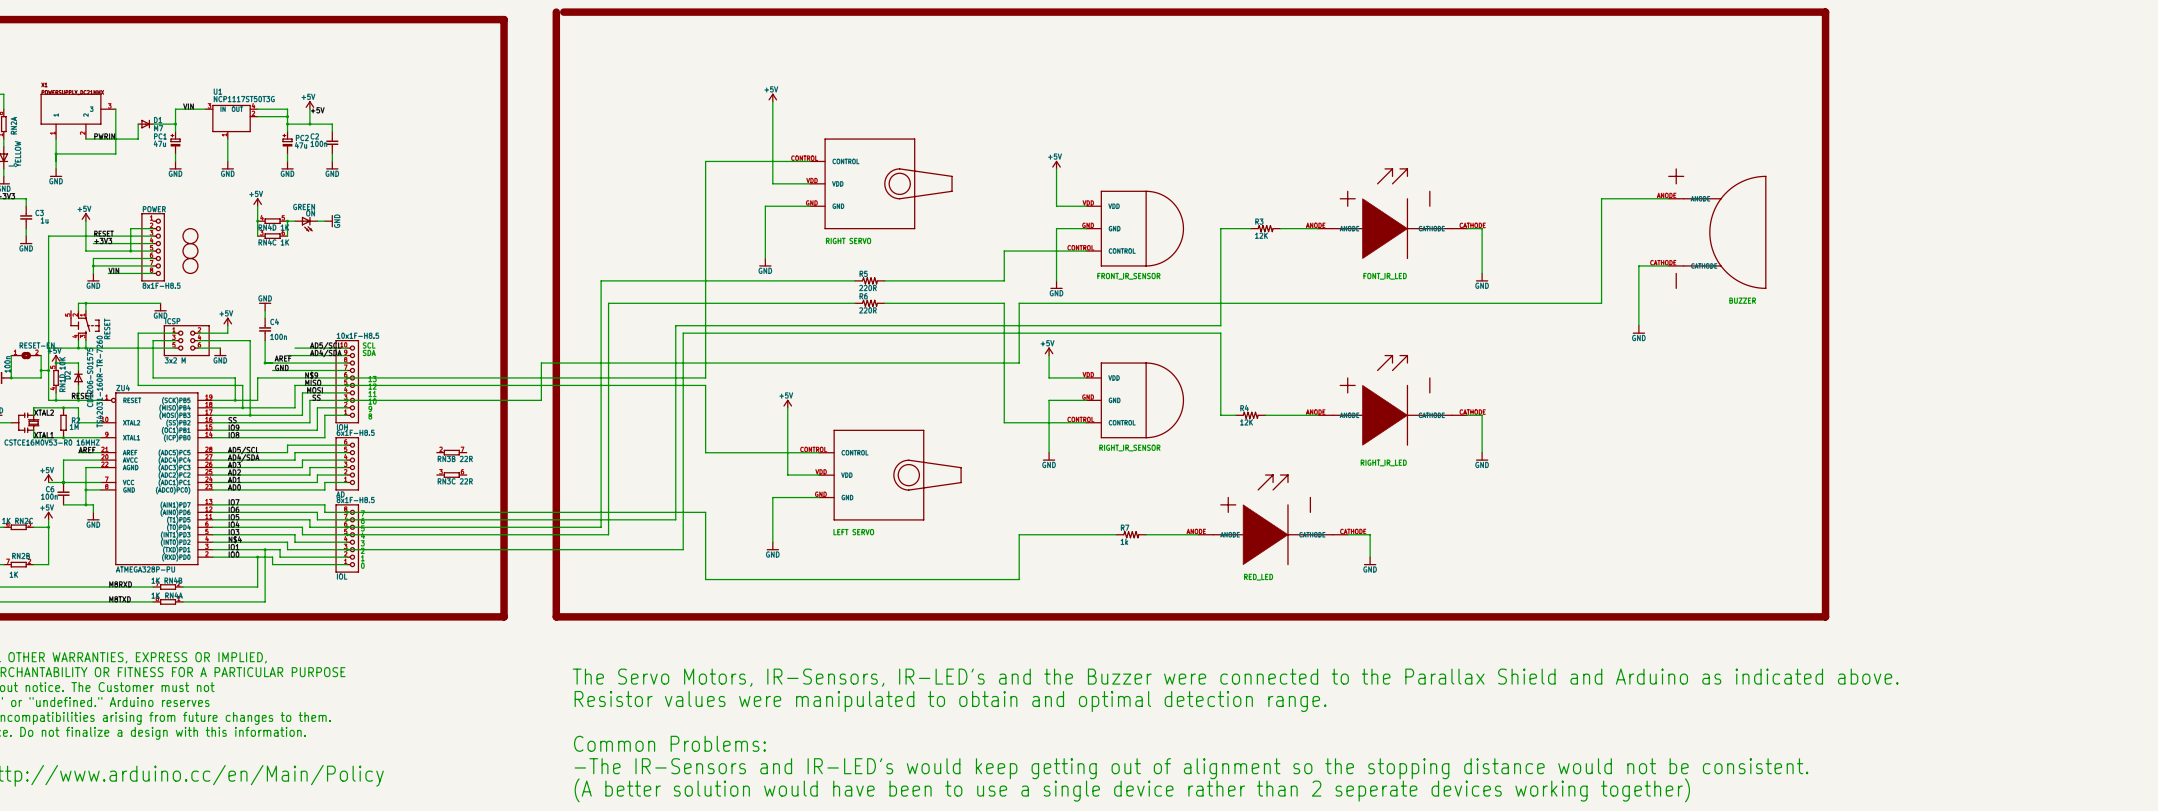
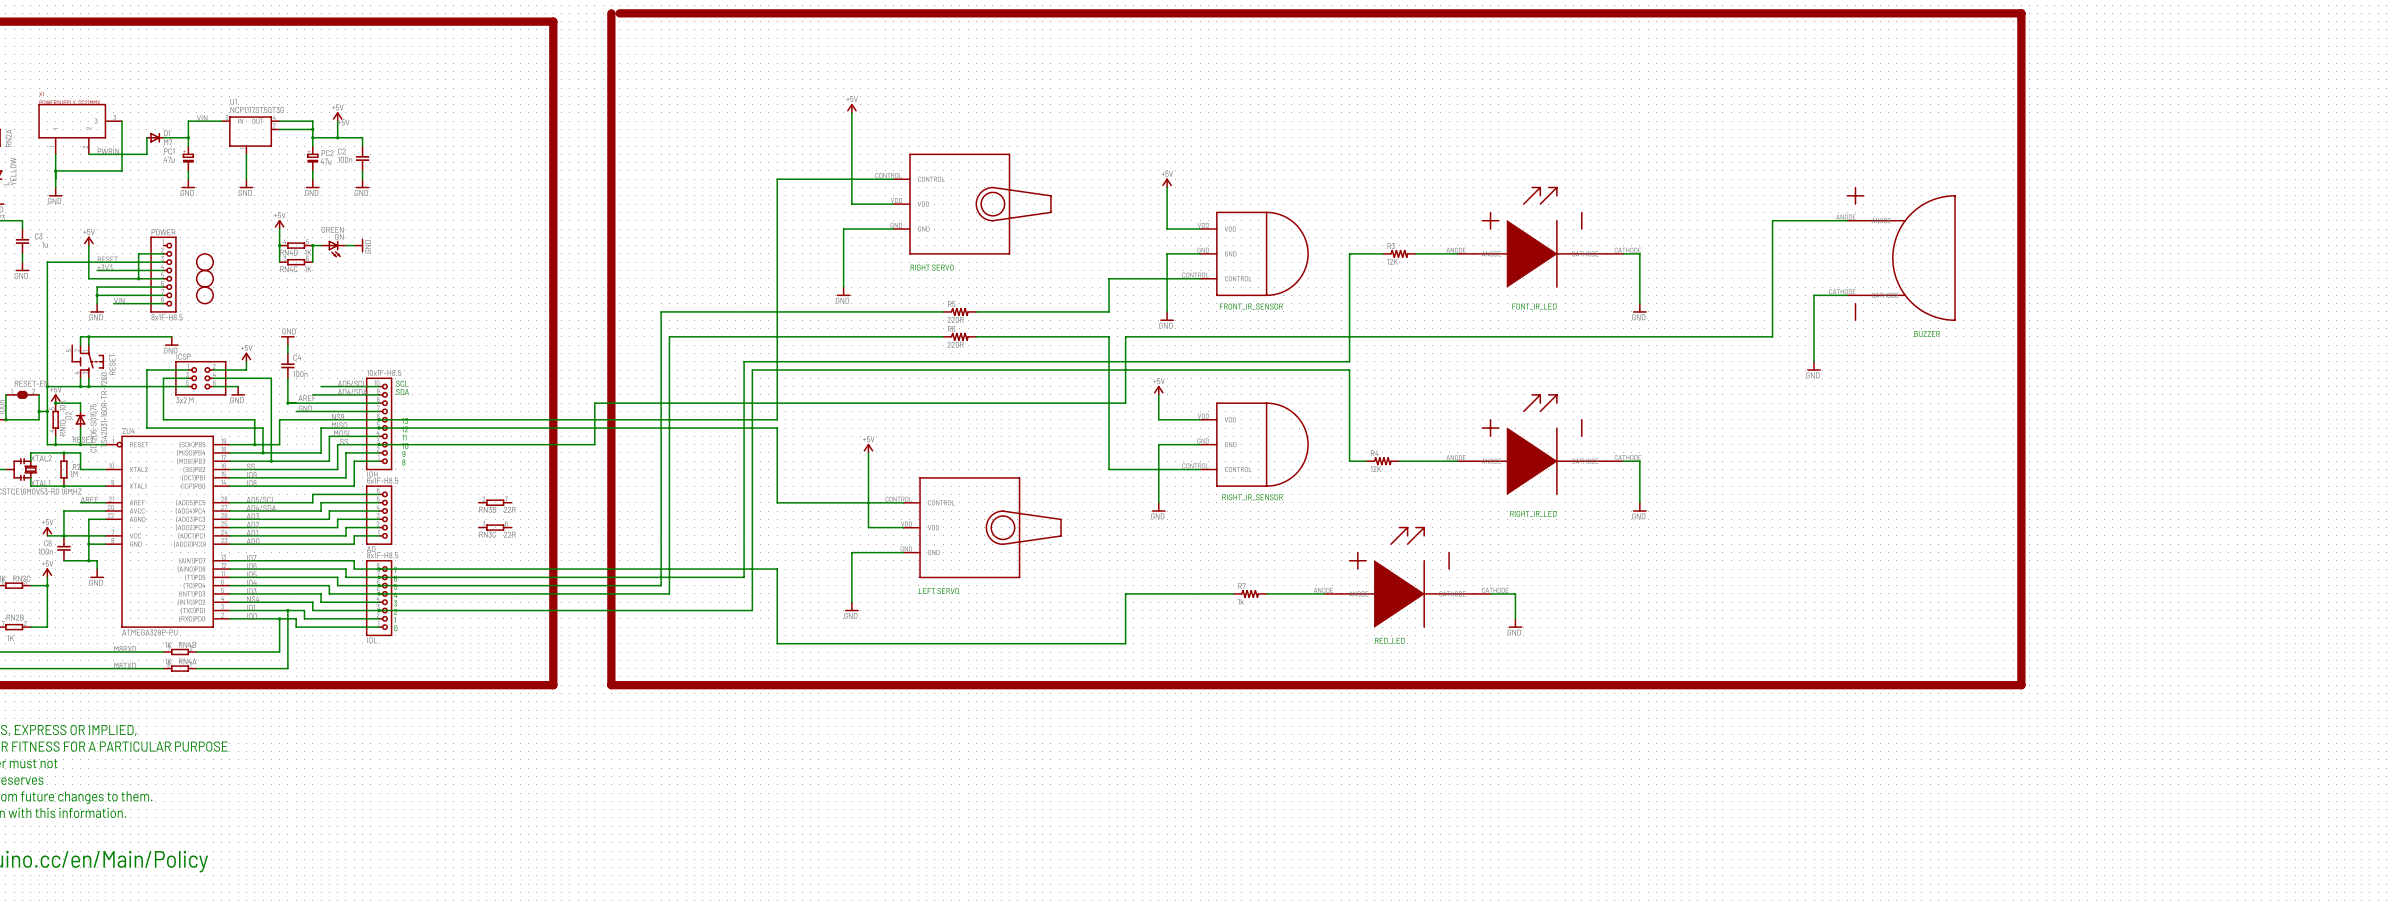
text: The Servo Motors, IR-Sensors, IR-LED's and the Buzzer were connected to the Parallax Shield and Arduino as indicated above. (1235, 677) -> none
text: Resistor values were manipulated to obtain and optimal detection range. (950, 701) -> none
text: Common Problems: (669, 743) -> none
text: -The IR-Sensors and IR-LED's would keep getting out of alignment so the stopping distance would not be consistent. (1191, 768) -> none
text: (A better solution would have been to use a single device rather than 2 seperate devices working together) (1132, 790) -> none

